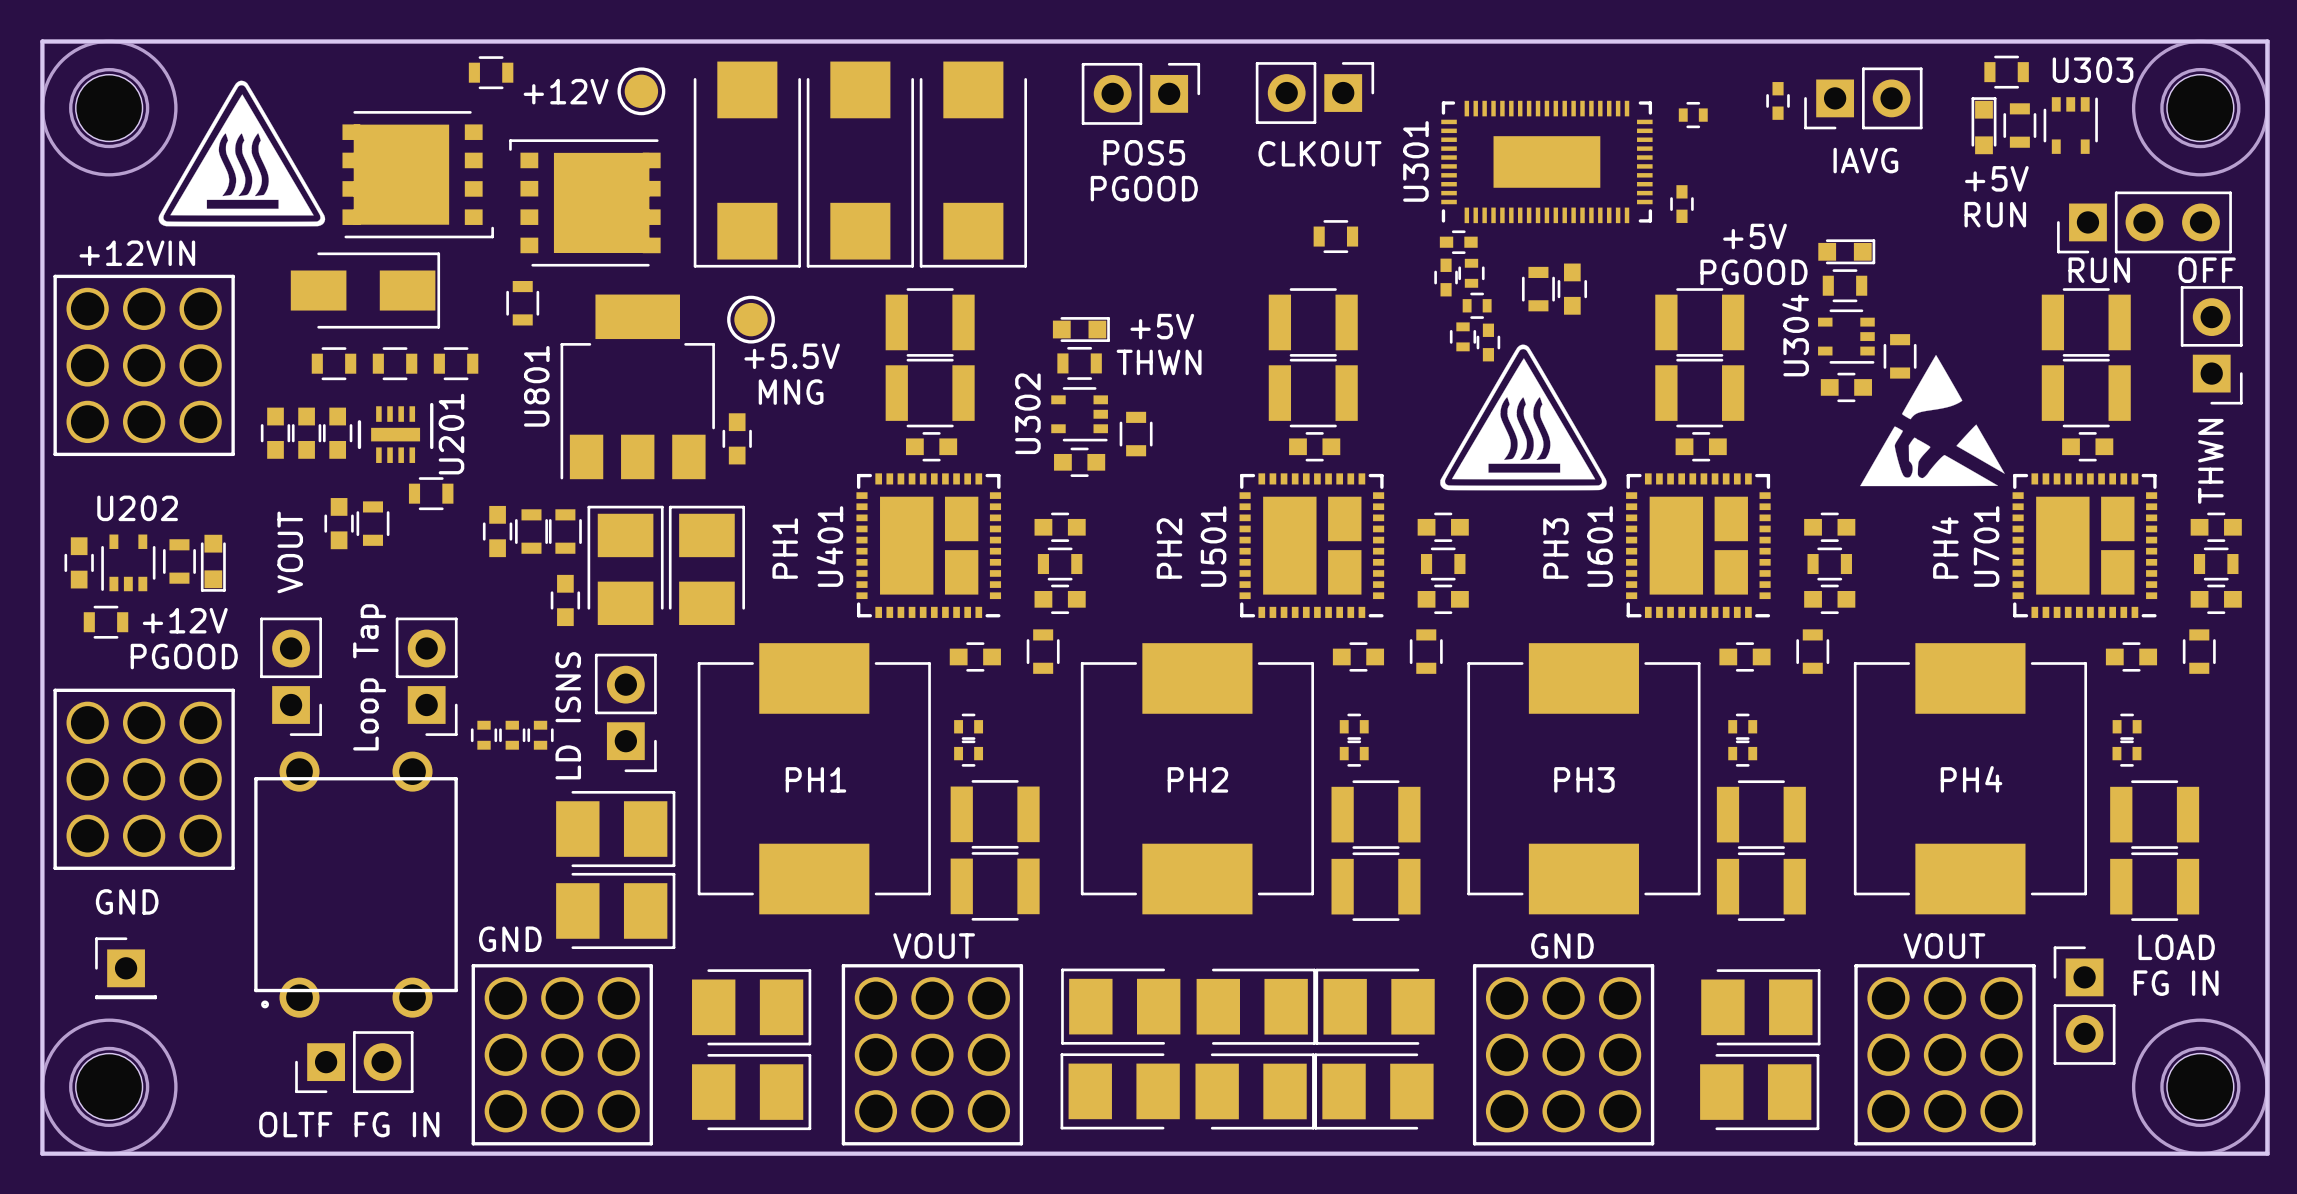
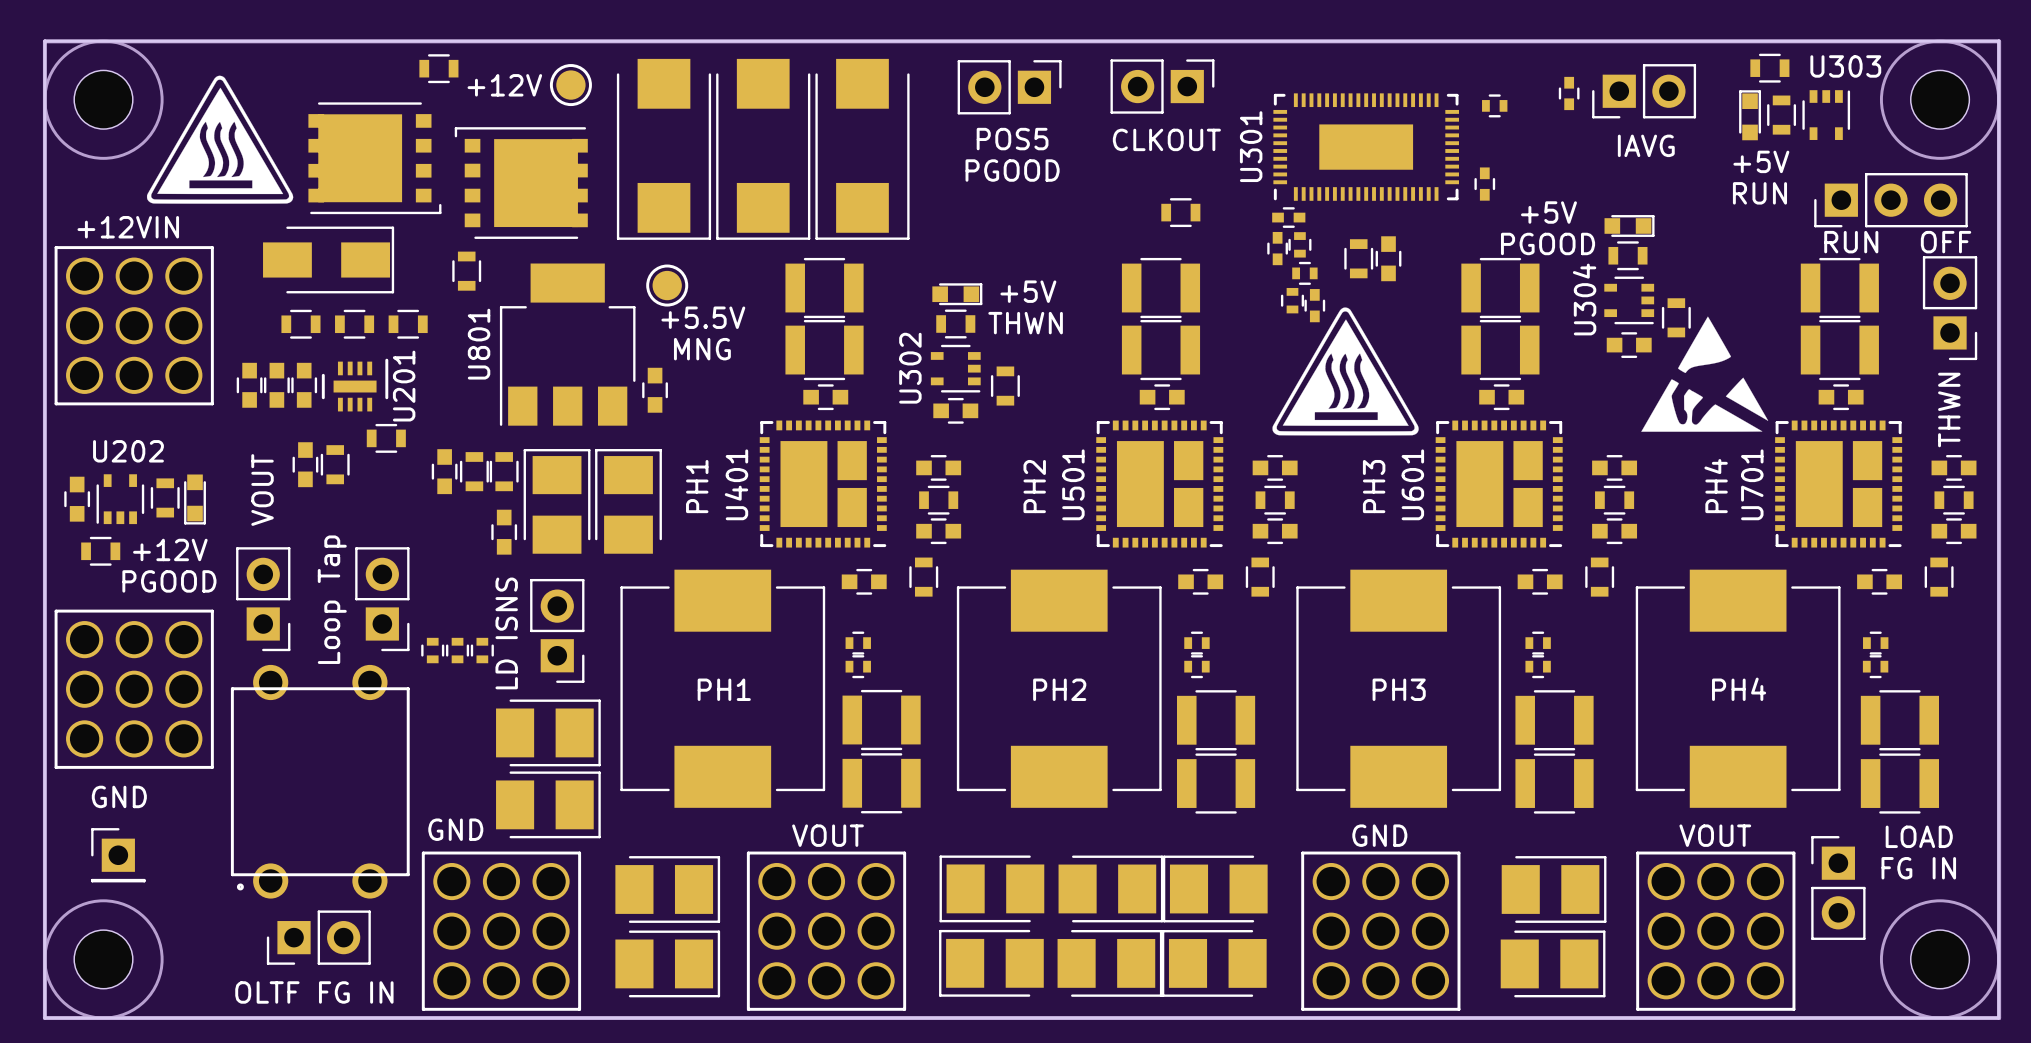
part footprint: [40, 39, 178, 177] -> [43, 39, 164, 160]
part footprint: [2131, 39, 2269, 177] -> [1879, 39, 2001, 160]
part footprint: [40, 1018, 178, 1156] -> [43, 899, 164, 1020]
part footprint: [2131, 1018, 2269, 1156] -> [1879, 899, 2001, 1020]

